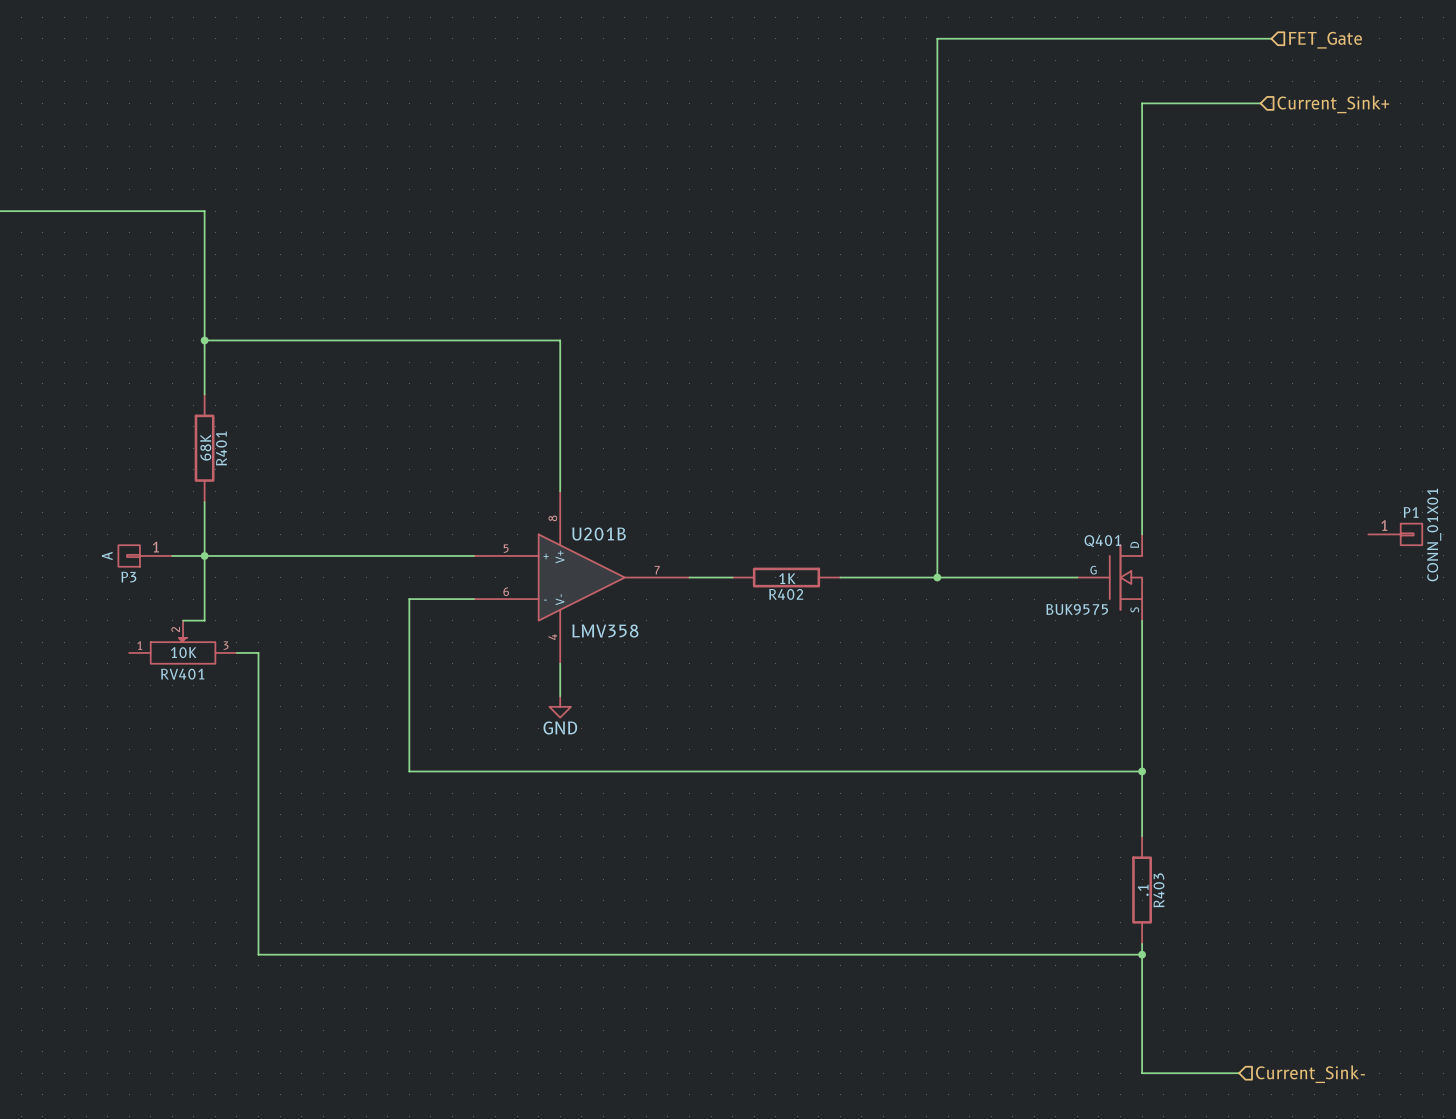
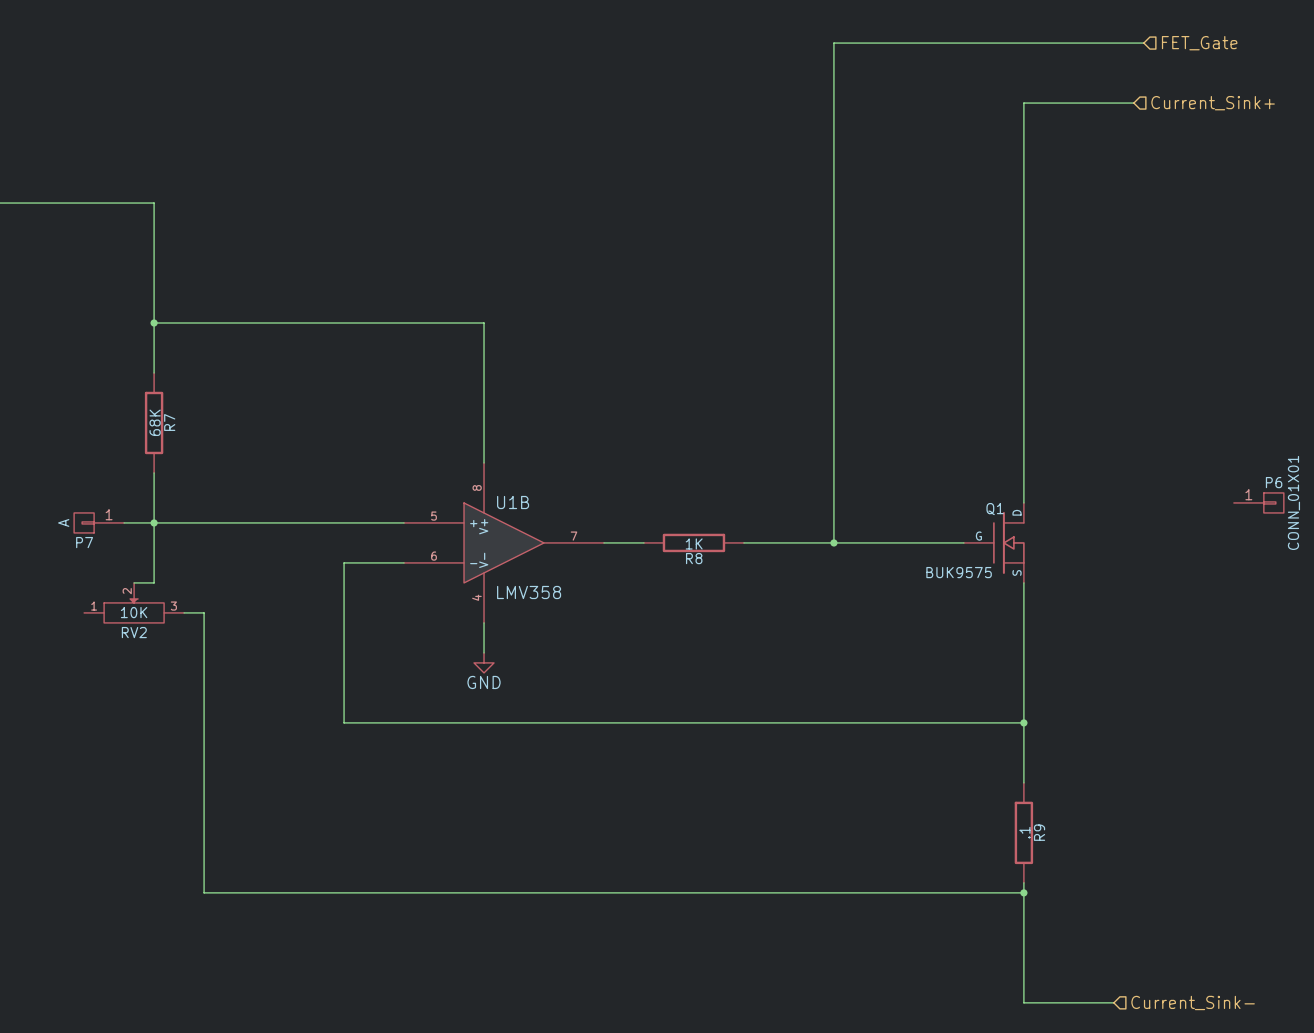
R401 name: R401 (221, 448) -> R7 (169, 422)
P1 name: P1 (1411, 512) -> P6 (1274, 482)
U201B name: U201B (599, 534) -> U1B (513, 502)
Q401 name: Q401 (1102, 541) -> Q1 (995, 509)
P3 name: P3 (128, 577) -> P7 (84, 542)
R402 name: R402 (786, 594) -> R8 (694, 558)
RV401 name: RV401 (182, 674) -> RV2 (134, 632)
R403 name: R403 (1158, 890) -> R9 (1039, 832)

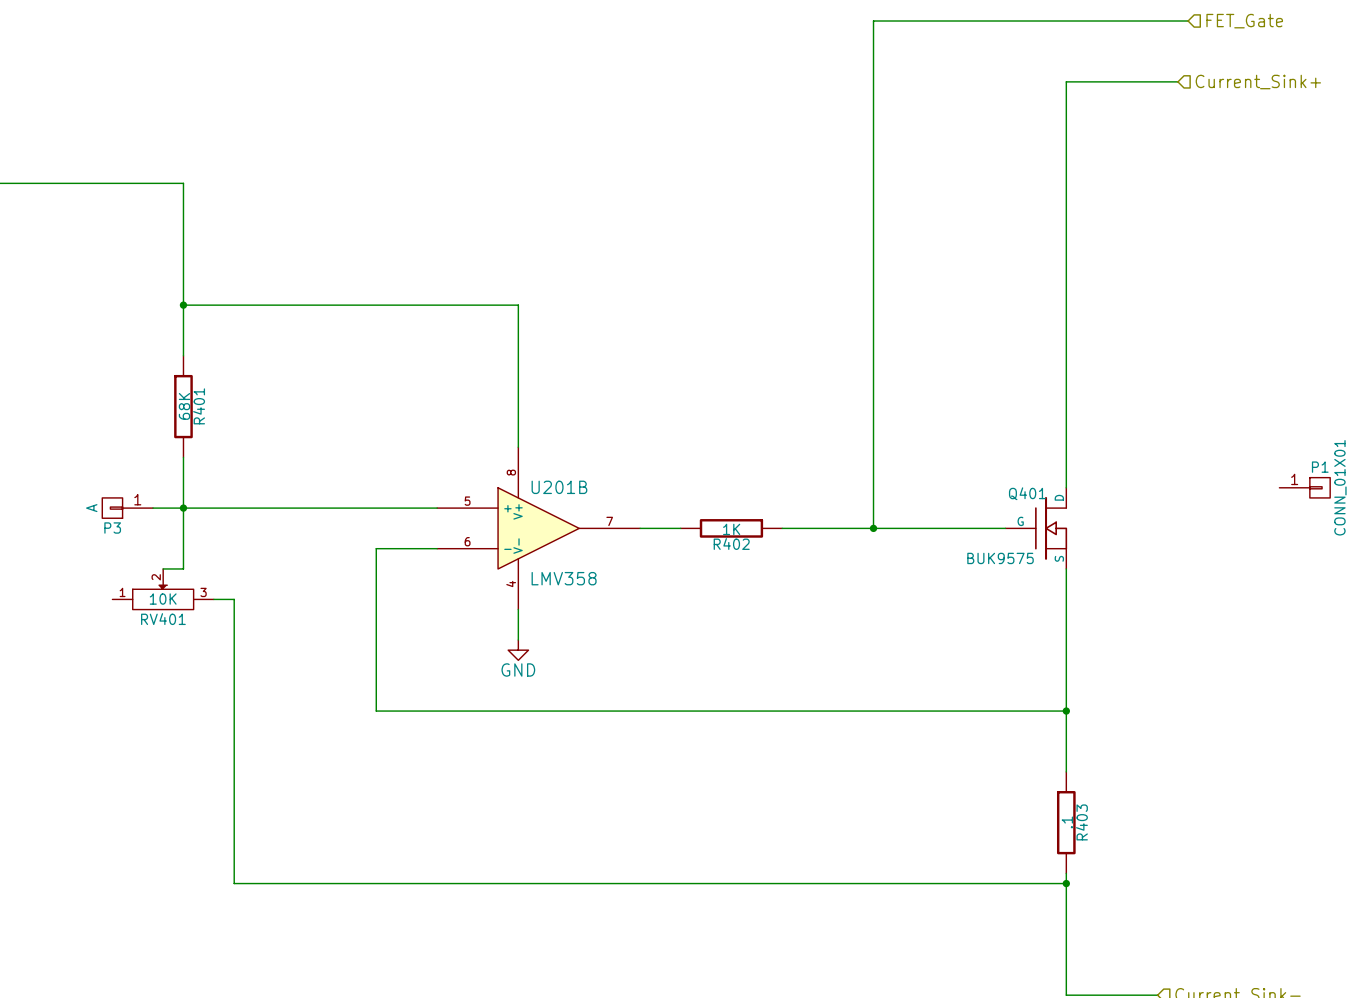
R7 name: R7 (169, 422) -> R401 (199, 406)
P6 name: P6 (1274, 482) -> P1 (1320, 467)
U1B name: U1B (513, 502) -> U201B (559, 487)
Q1 name: Q1 (995, 509) -> Q401 (1027, 493)
P7 name: P7 (84, 542) -> P3 (112, 528)
R8 name: R8 (694, 558) -> R402 (731, 544)
RV2 name: RV2 (134, 632) -> RV401 (163, 619)
R9 name: R9 (1039, 832) -> R403 (1081, 822)

